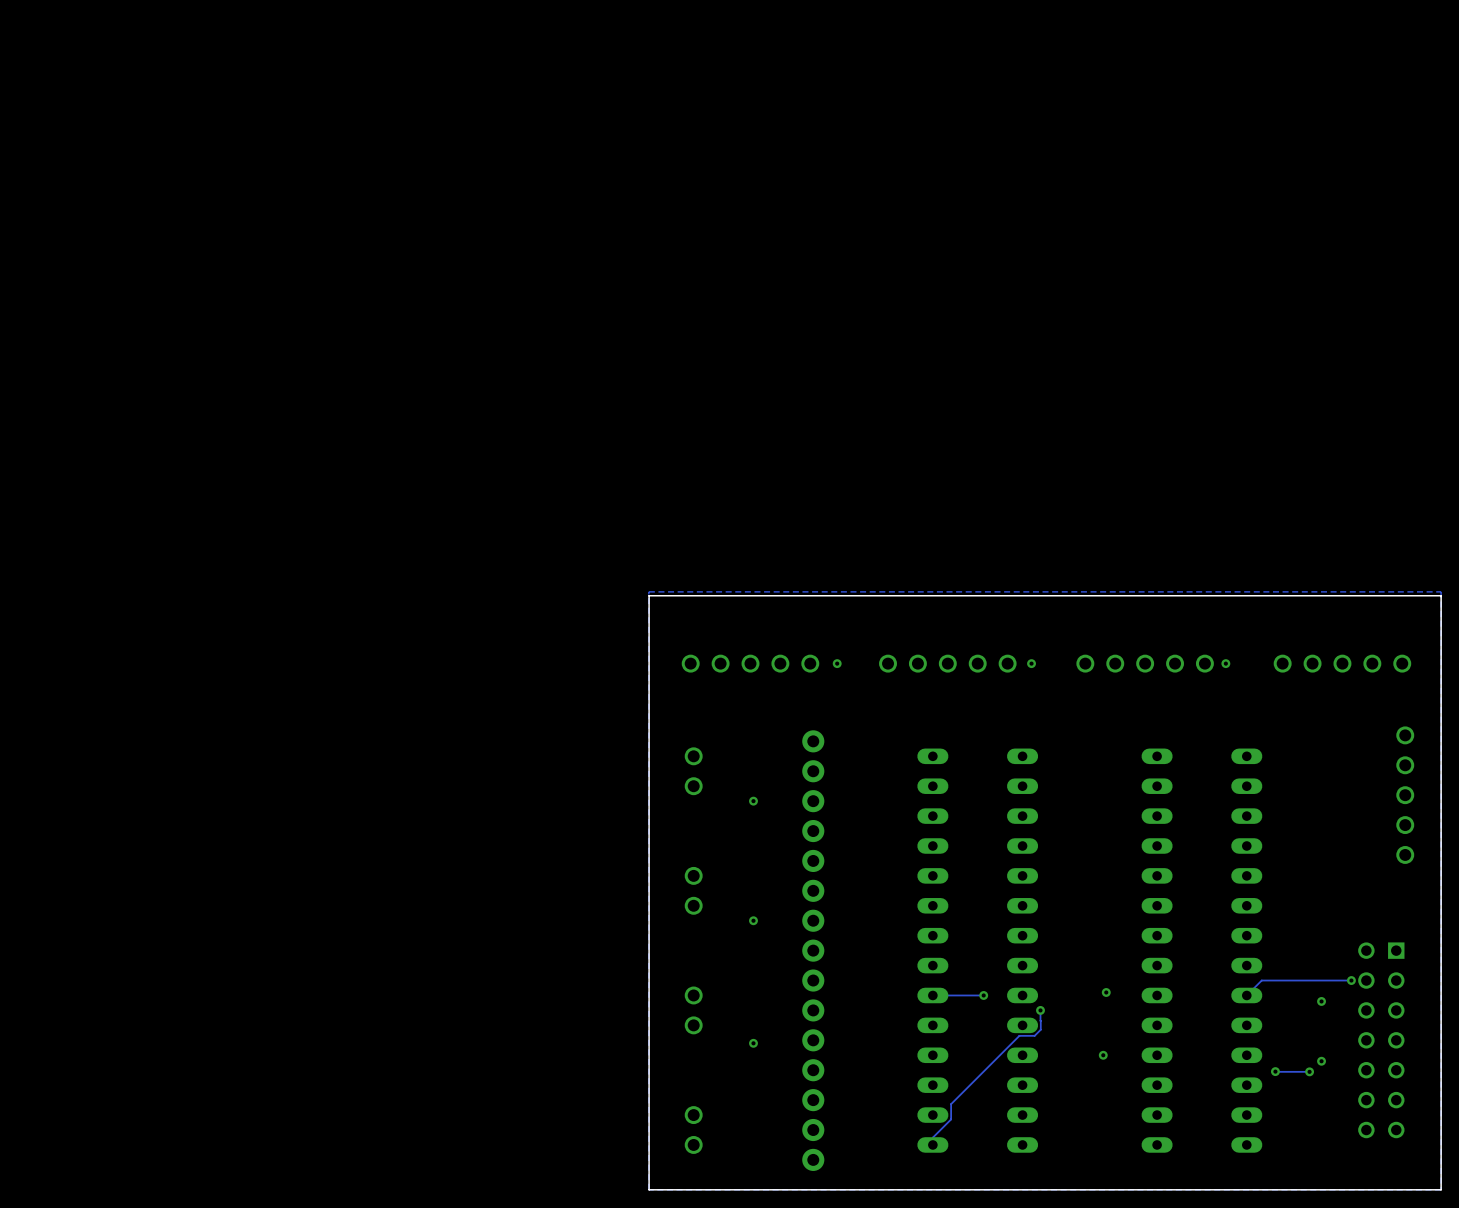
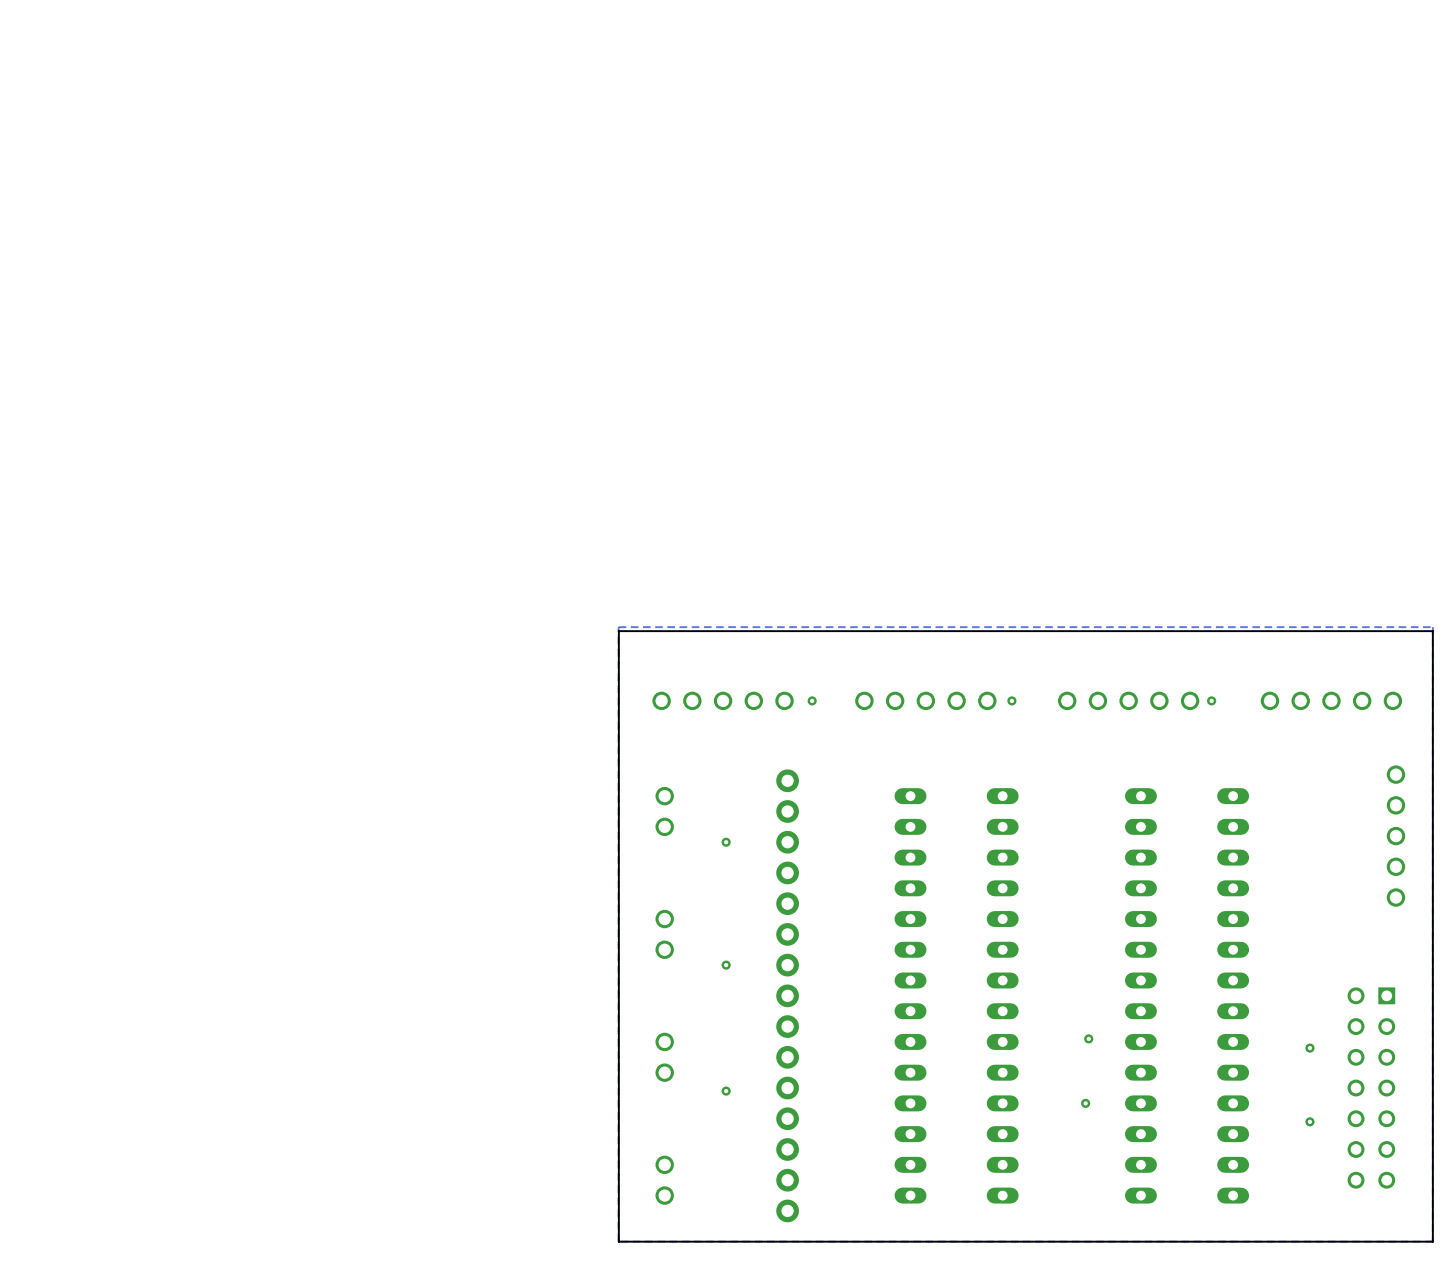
track: (1351, 980) (1261, 980) (1246, 995) -> none
via: (1351, 980) -> none
track: (983, 995) (932, 995) -> none
via: (983, 995) -> none
track: (1040, 1010) (1040, 1029) (1034, 1035) (1019, 1035) (951, 1104) (951, 1119) (932, 1137) (932, 1144) -> none
via: (1040, 1010) -> none
via: (1321, 1061) -> none
track: (1275, 1071) (1309, 1071) -> none
via: (1275, 1071) -> none
via: (1309, 1071) -> none
via: none -> (1309, 1121)

